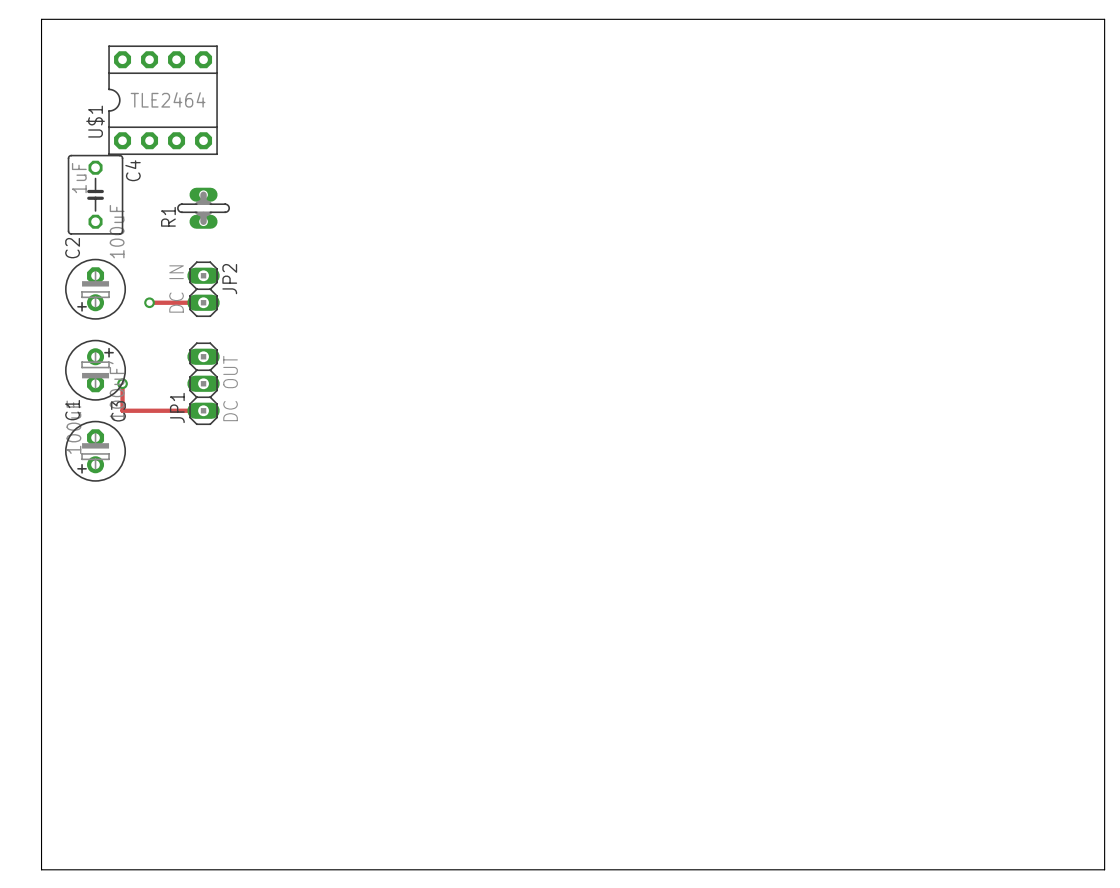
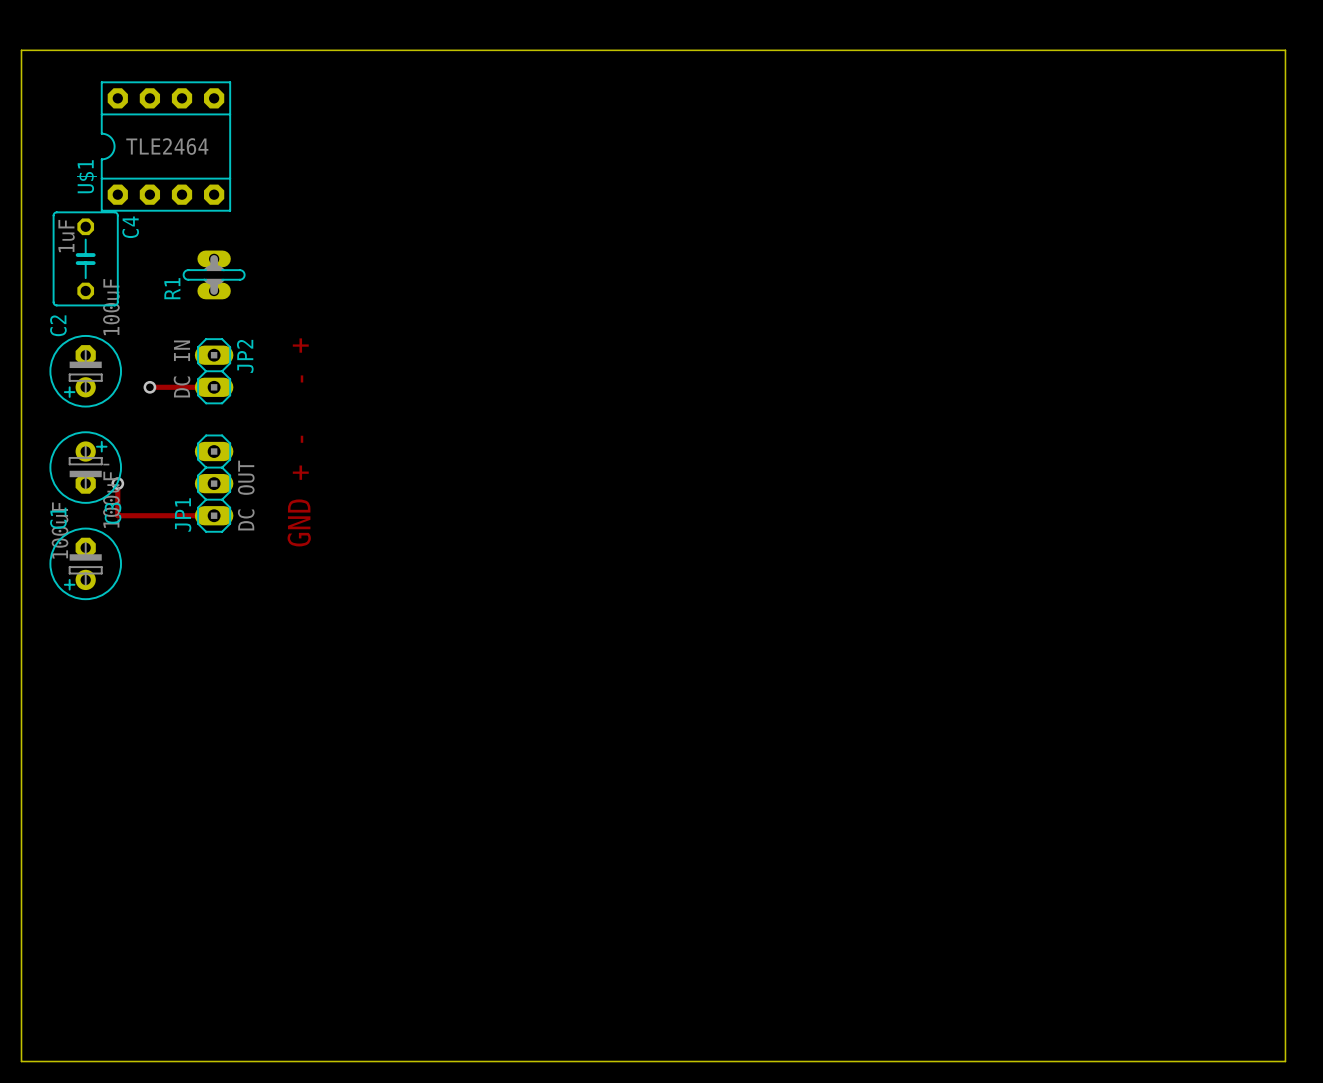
text: none -> - + (300, 360)
text: none -> GND + - (299, 491)

